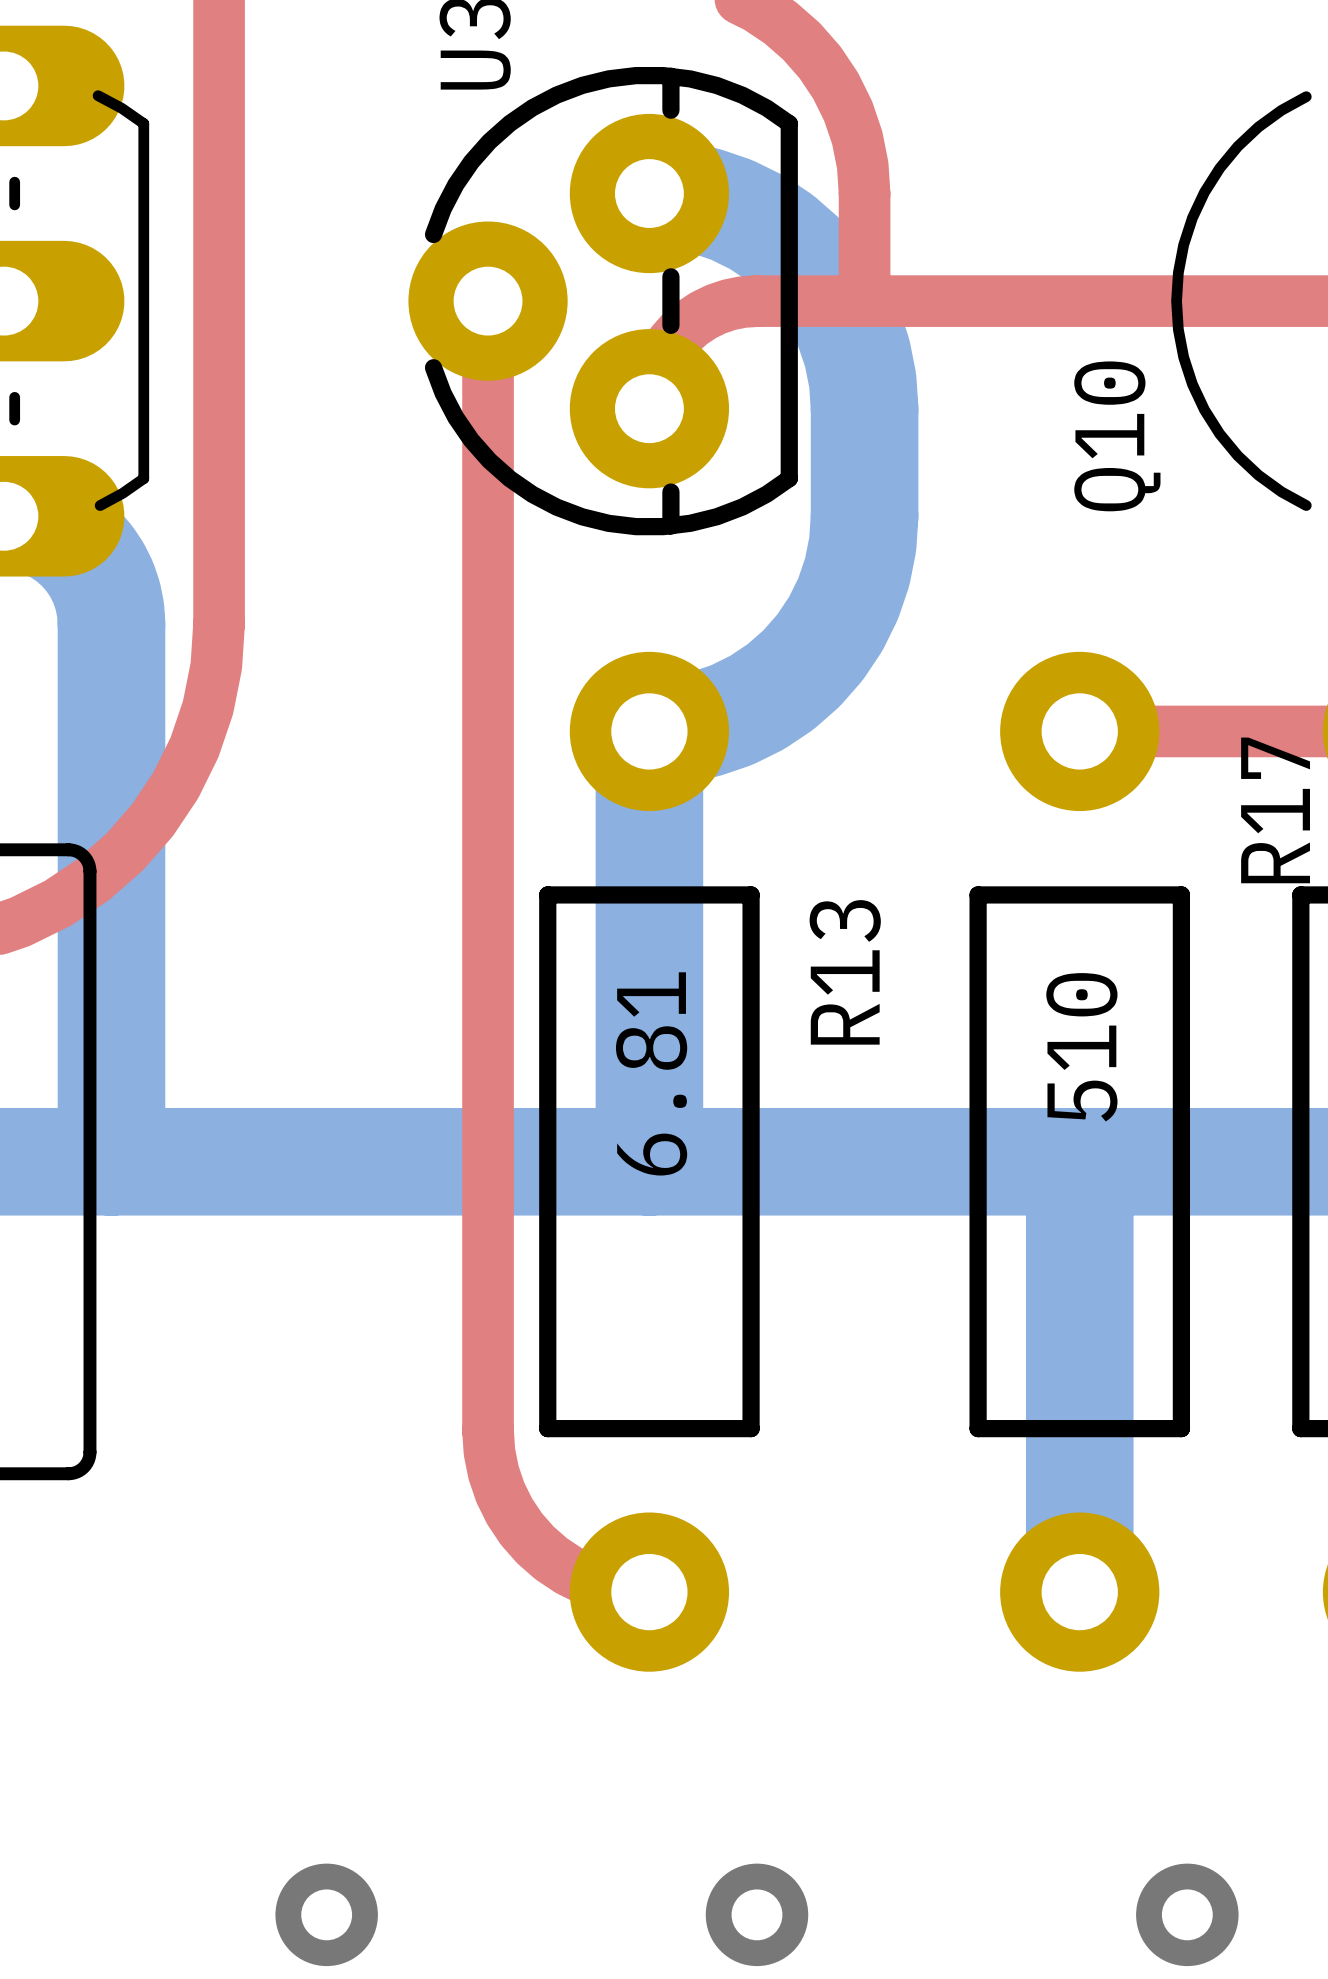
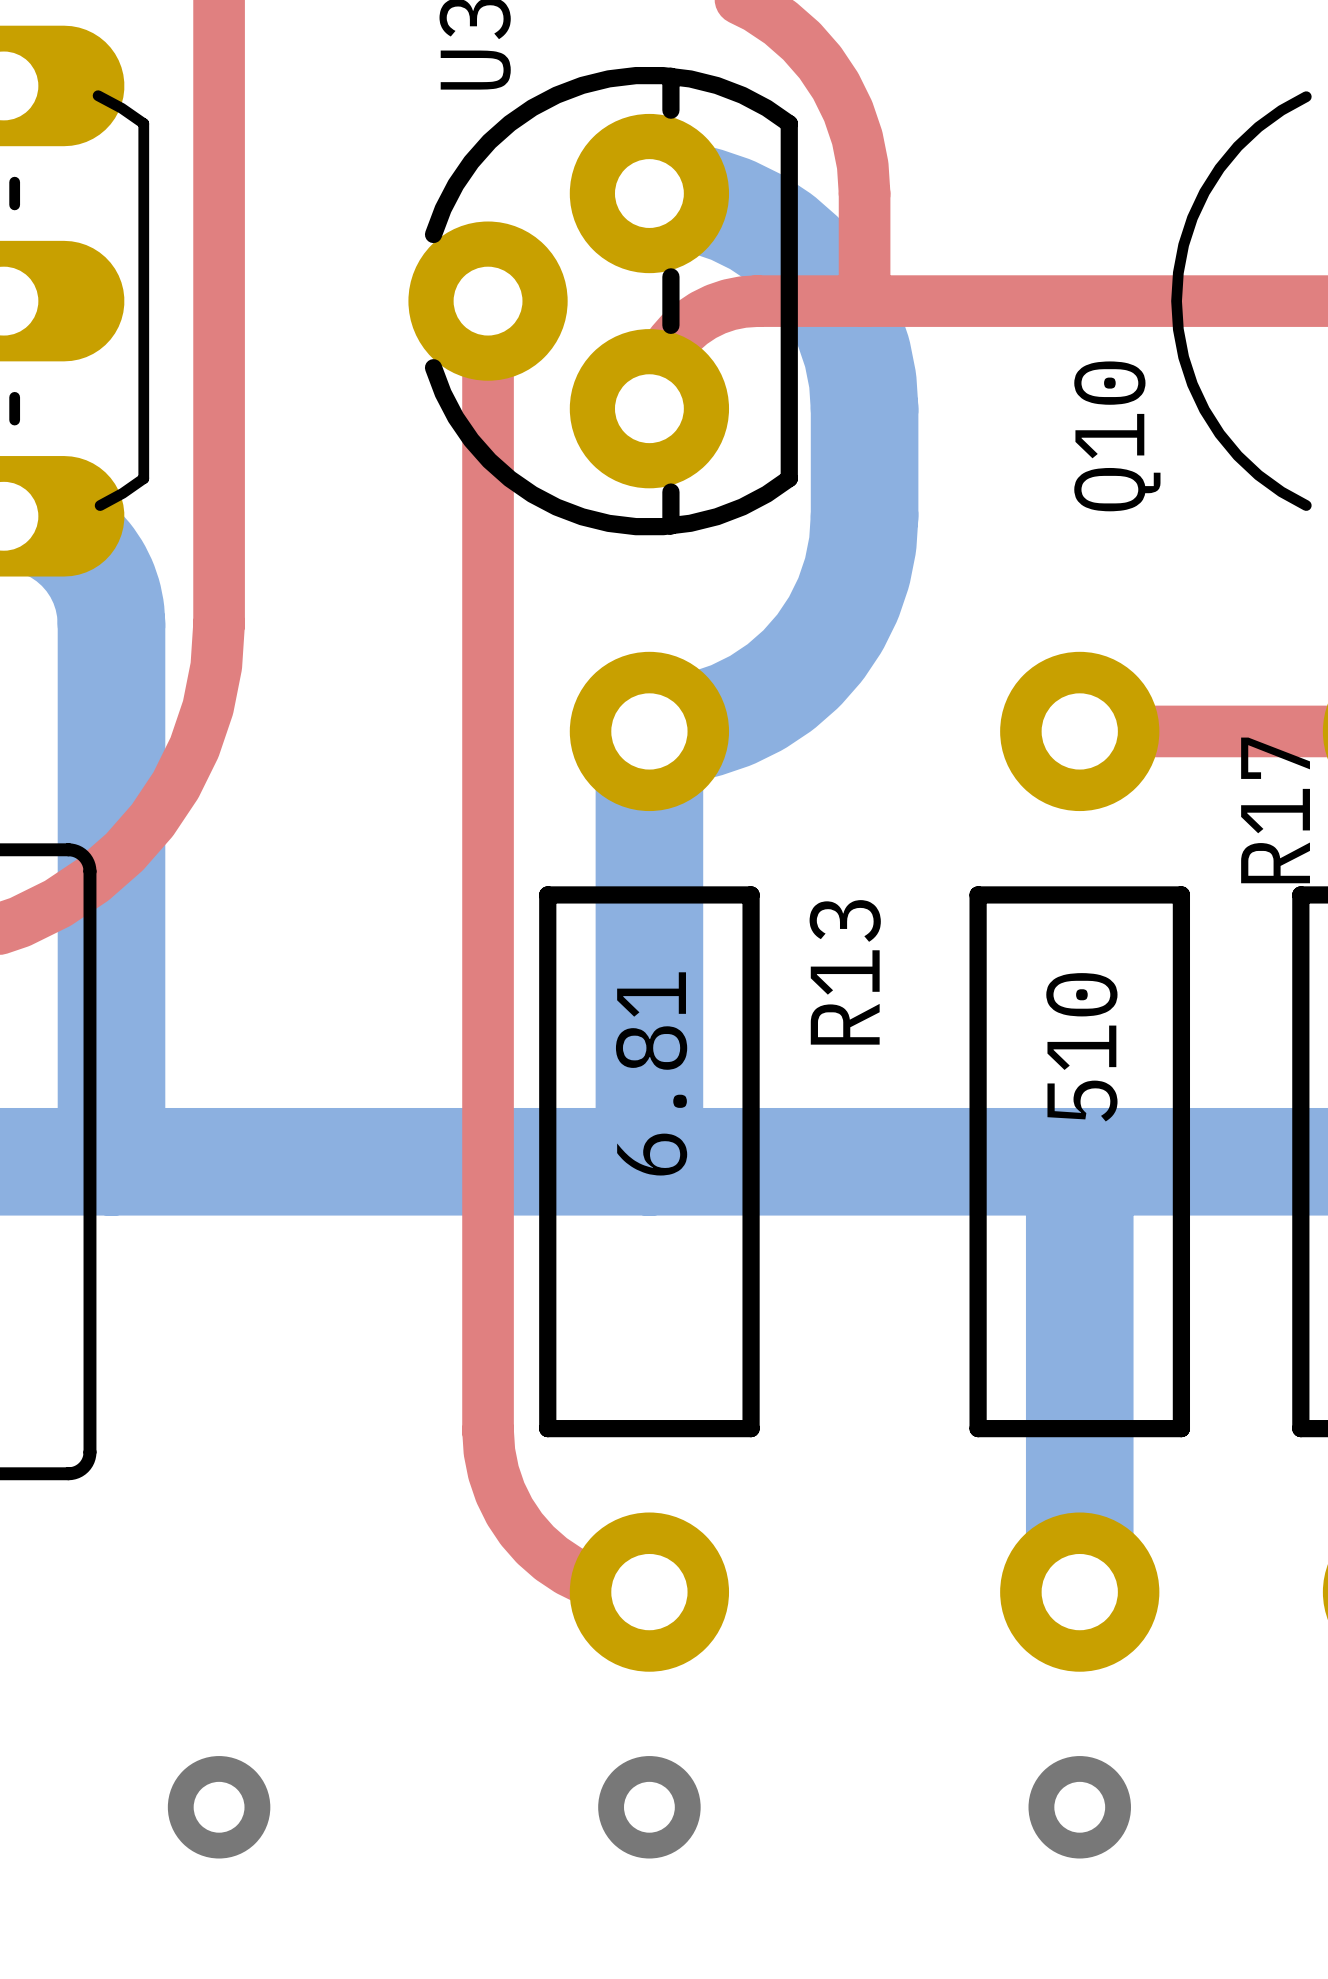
via position: (326, 1914) -> (219, 1807)
via position: (757, 1914) -> (649, 1807)
via position: (1187, 1914) -> (1079, 1807)

